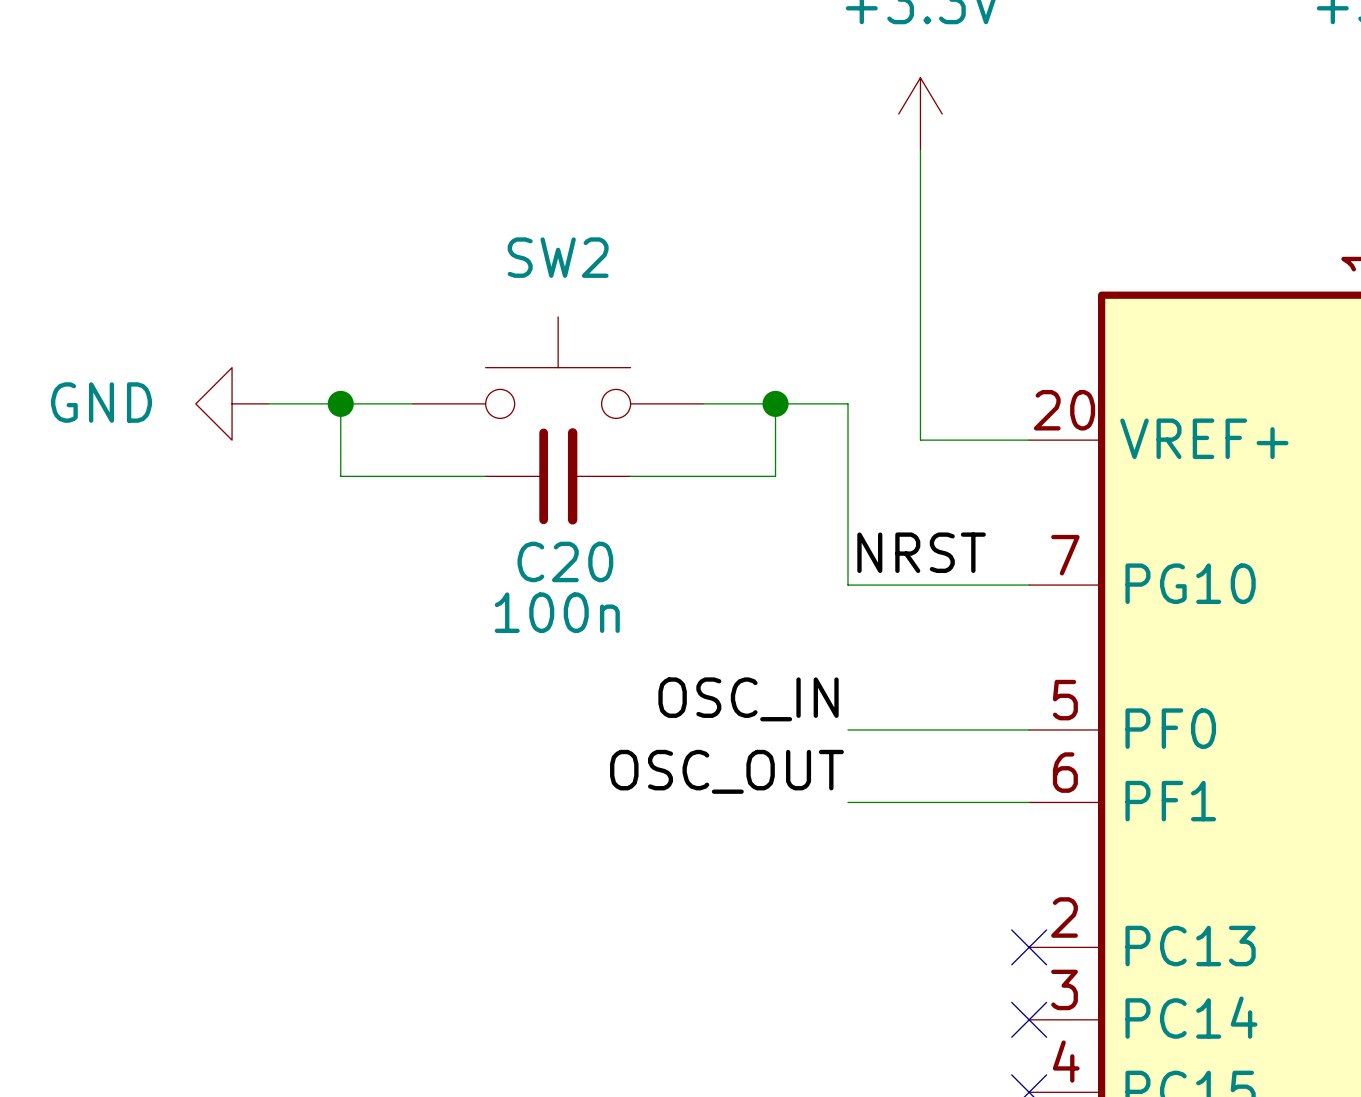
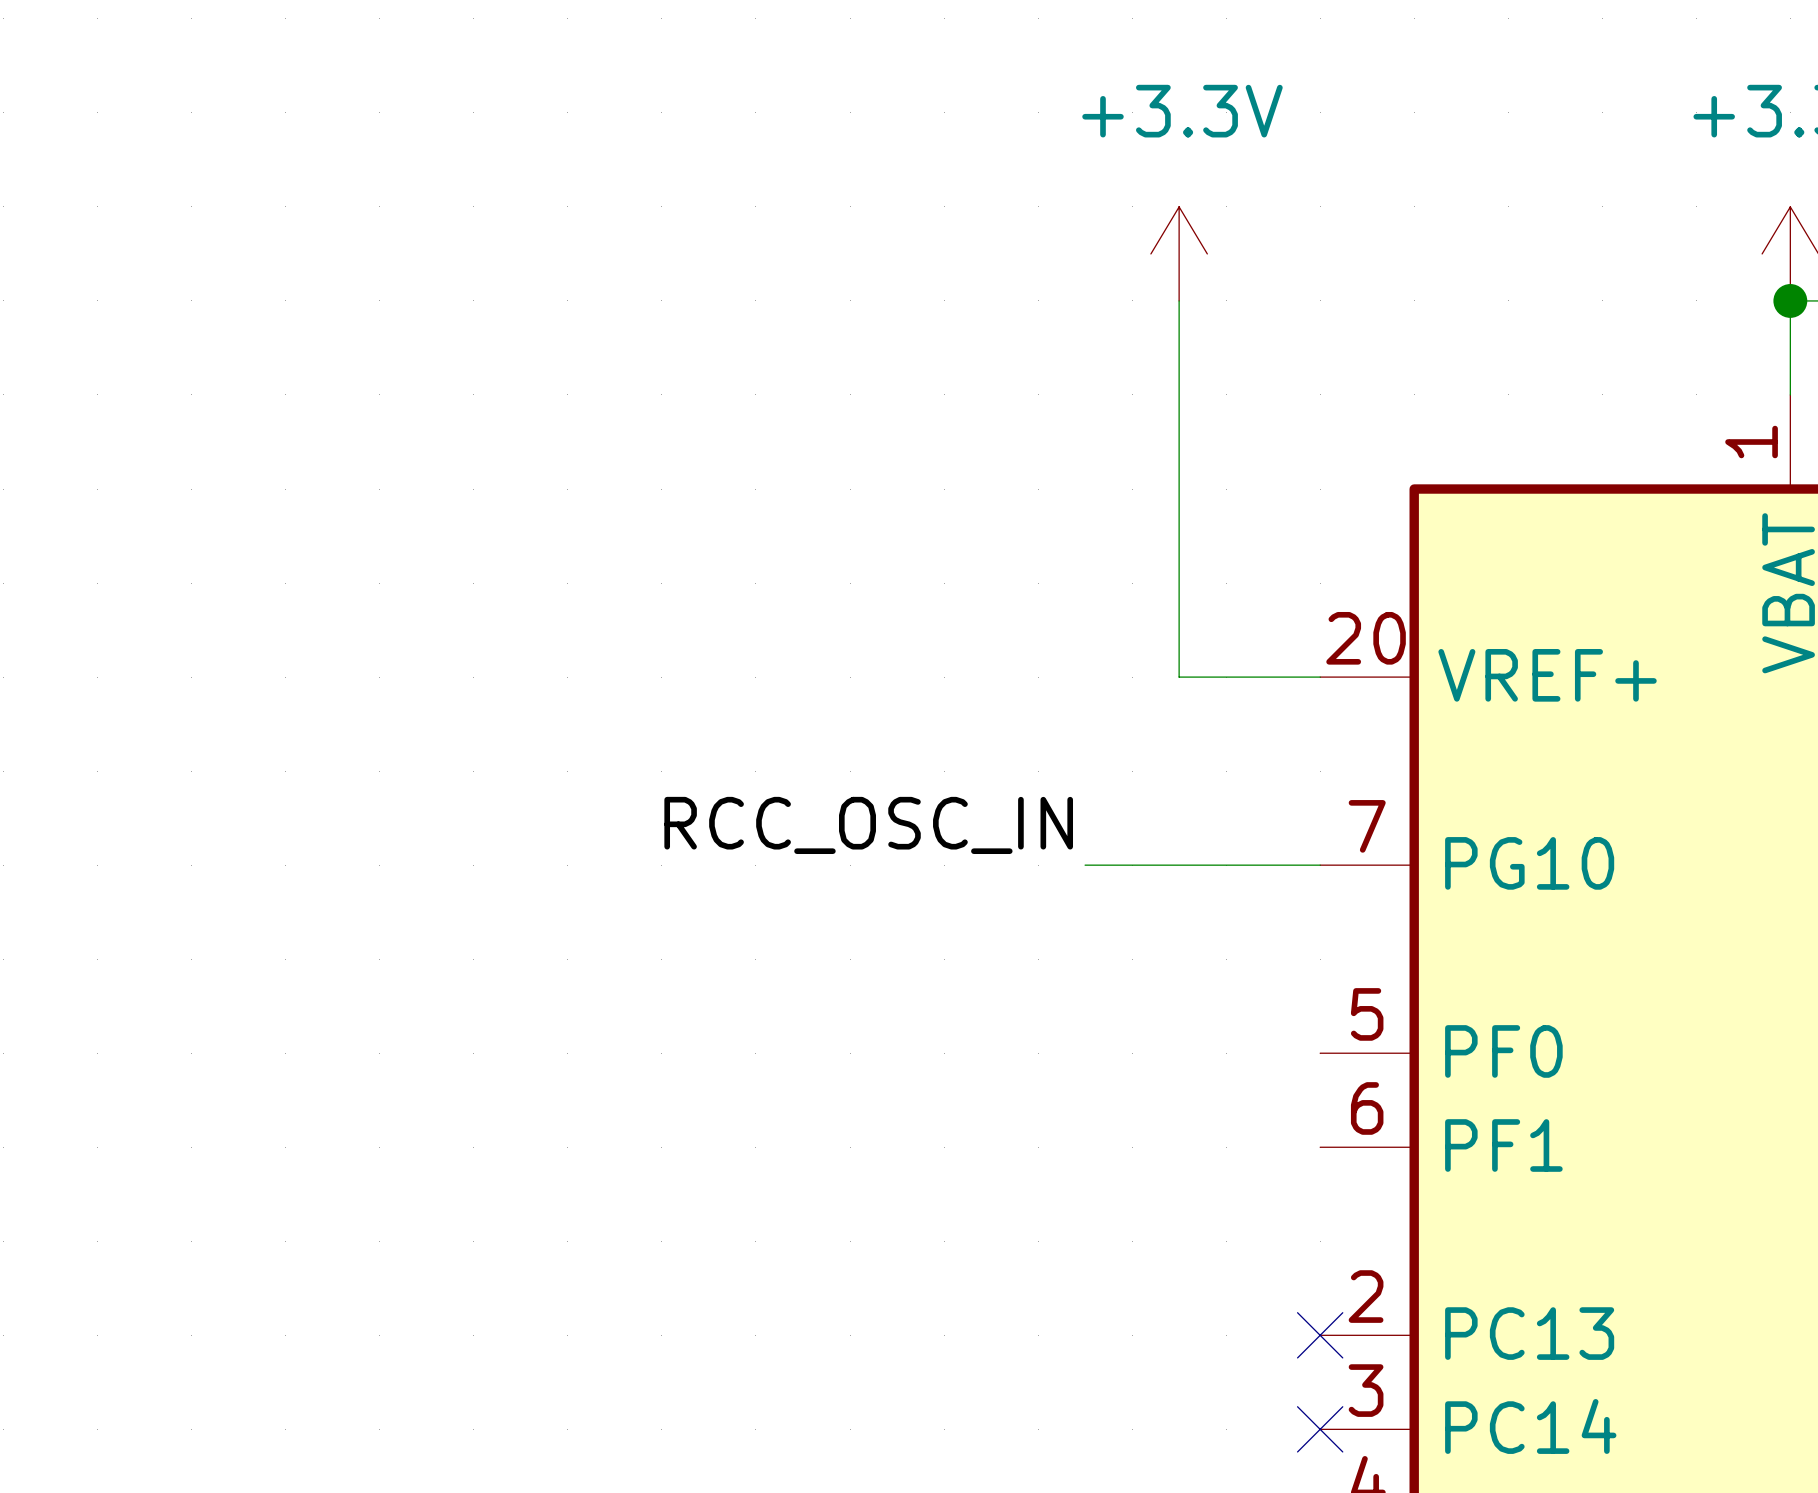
SW2: (558, 367) -> none
power symbol: GND (232, 403) -> none
wire: (268, 403) (413, 403) -> none
wire: (340, 403) (340, 476) (485, 476) -> none
junction: (340, 403) -> none
wire: (703, 403) (847, 403) (847, 585) -> none
wire: (775, 403) (775, 476) (630, 476) -> none
junction: (775, 403) -> none
C20: 100n (558, 476) -> none
label: NRST (921, 552) -> RCC_OSC_IN (868, 825)
label: OSC_IN (748, 699) -> none
wire: (847, 729) (1029, 729) -> none
label: OSC_OUT (726, 771) -> none
wire: (847, 802) (1029, 802) -> none

